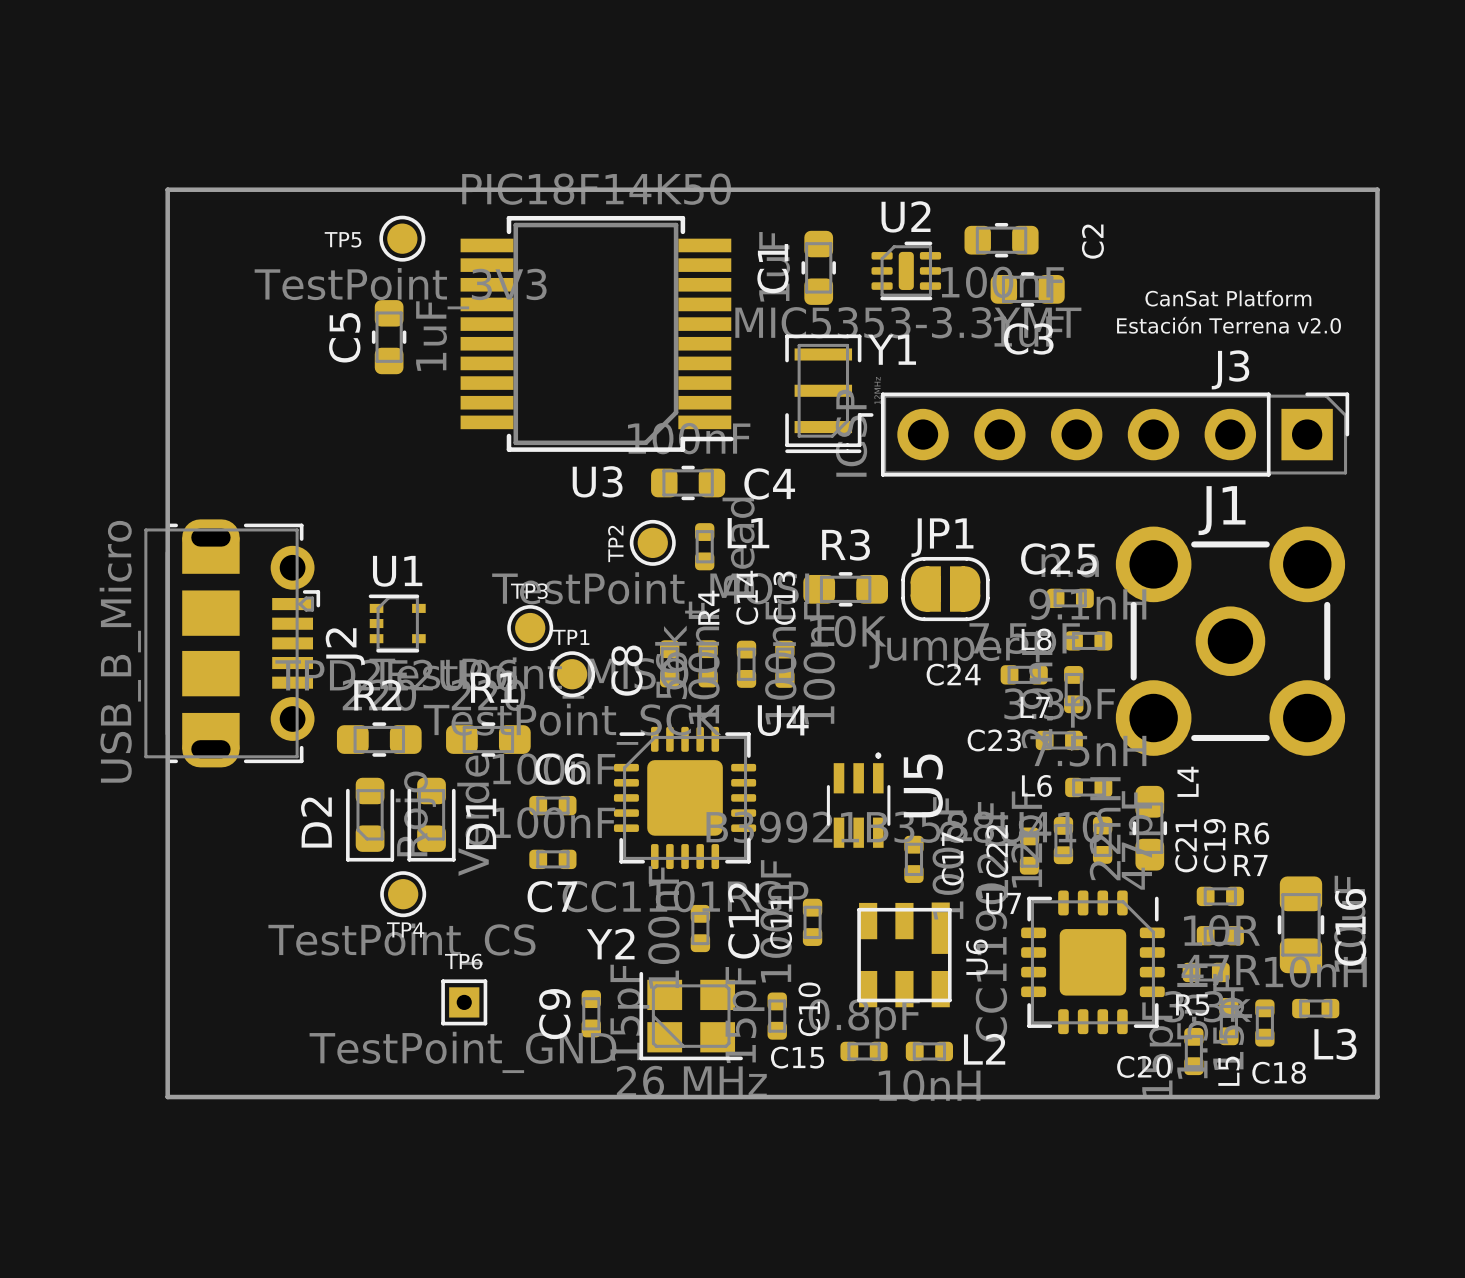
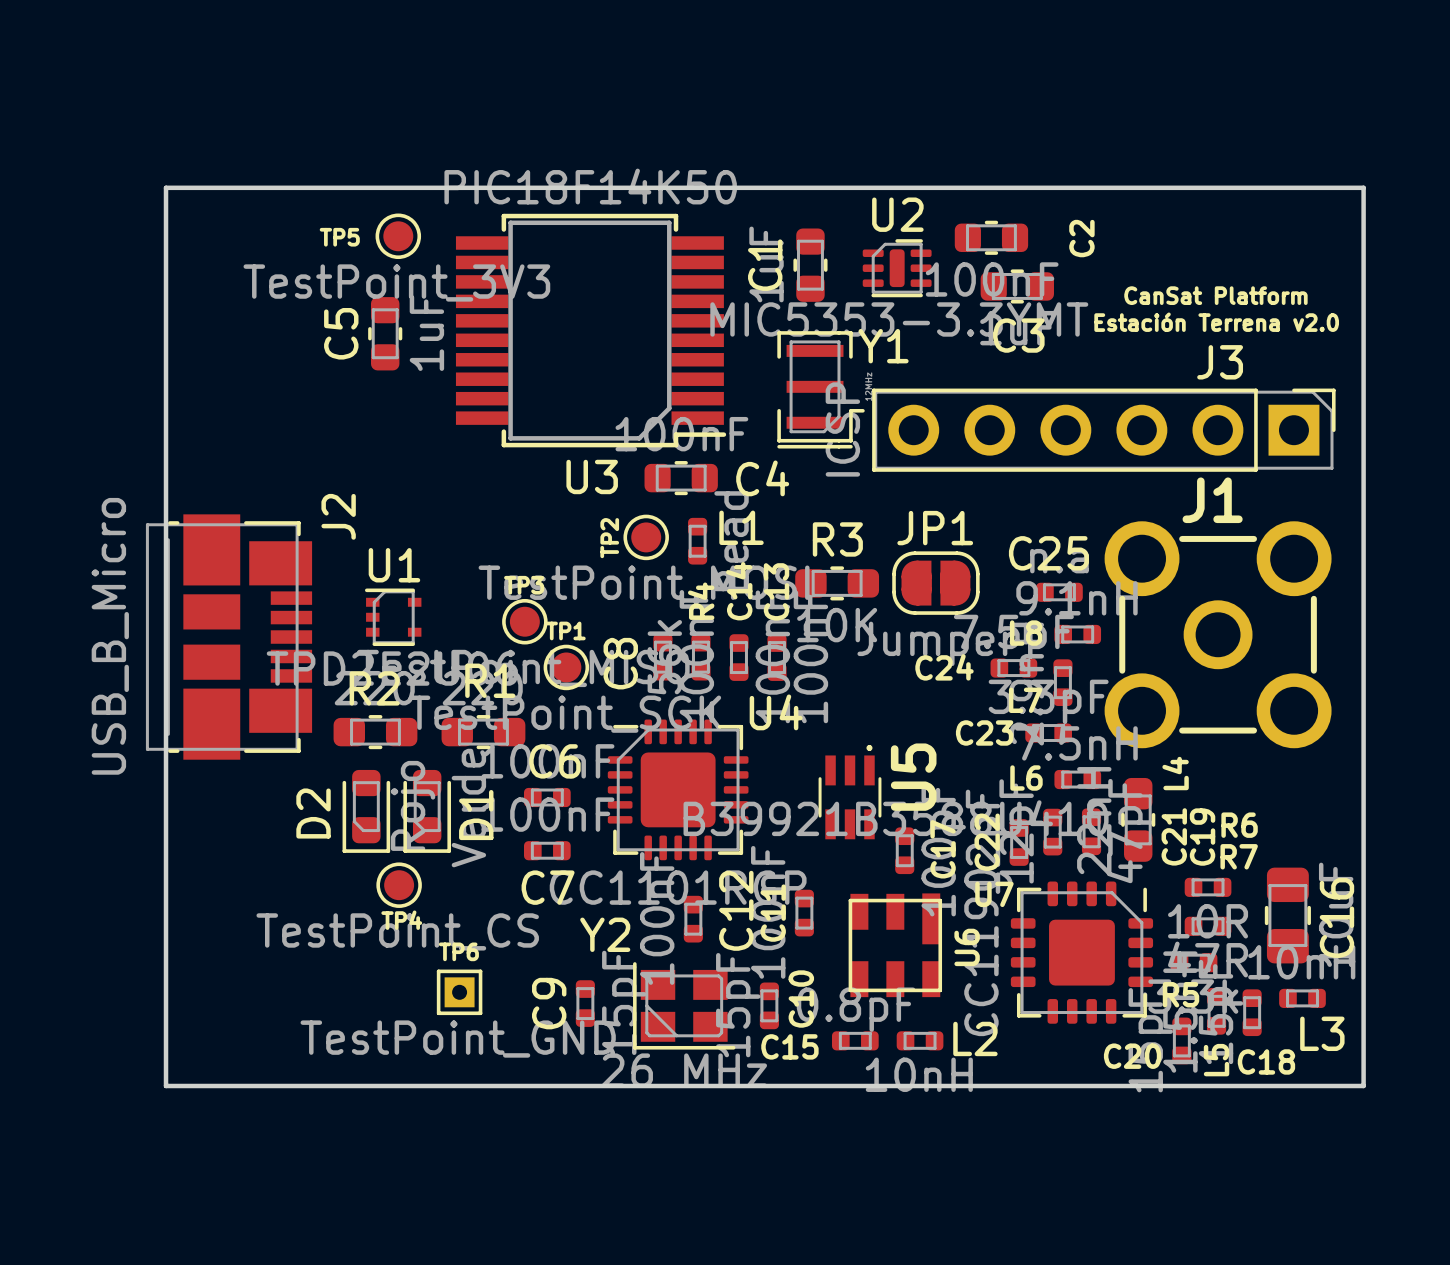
J2 footprint: [144, 519, 321, 768] -> [145, 514, 313, 760]
J2 name position: J2 (345, 646) -> J2 (338, 516)

